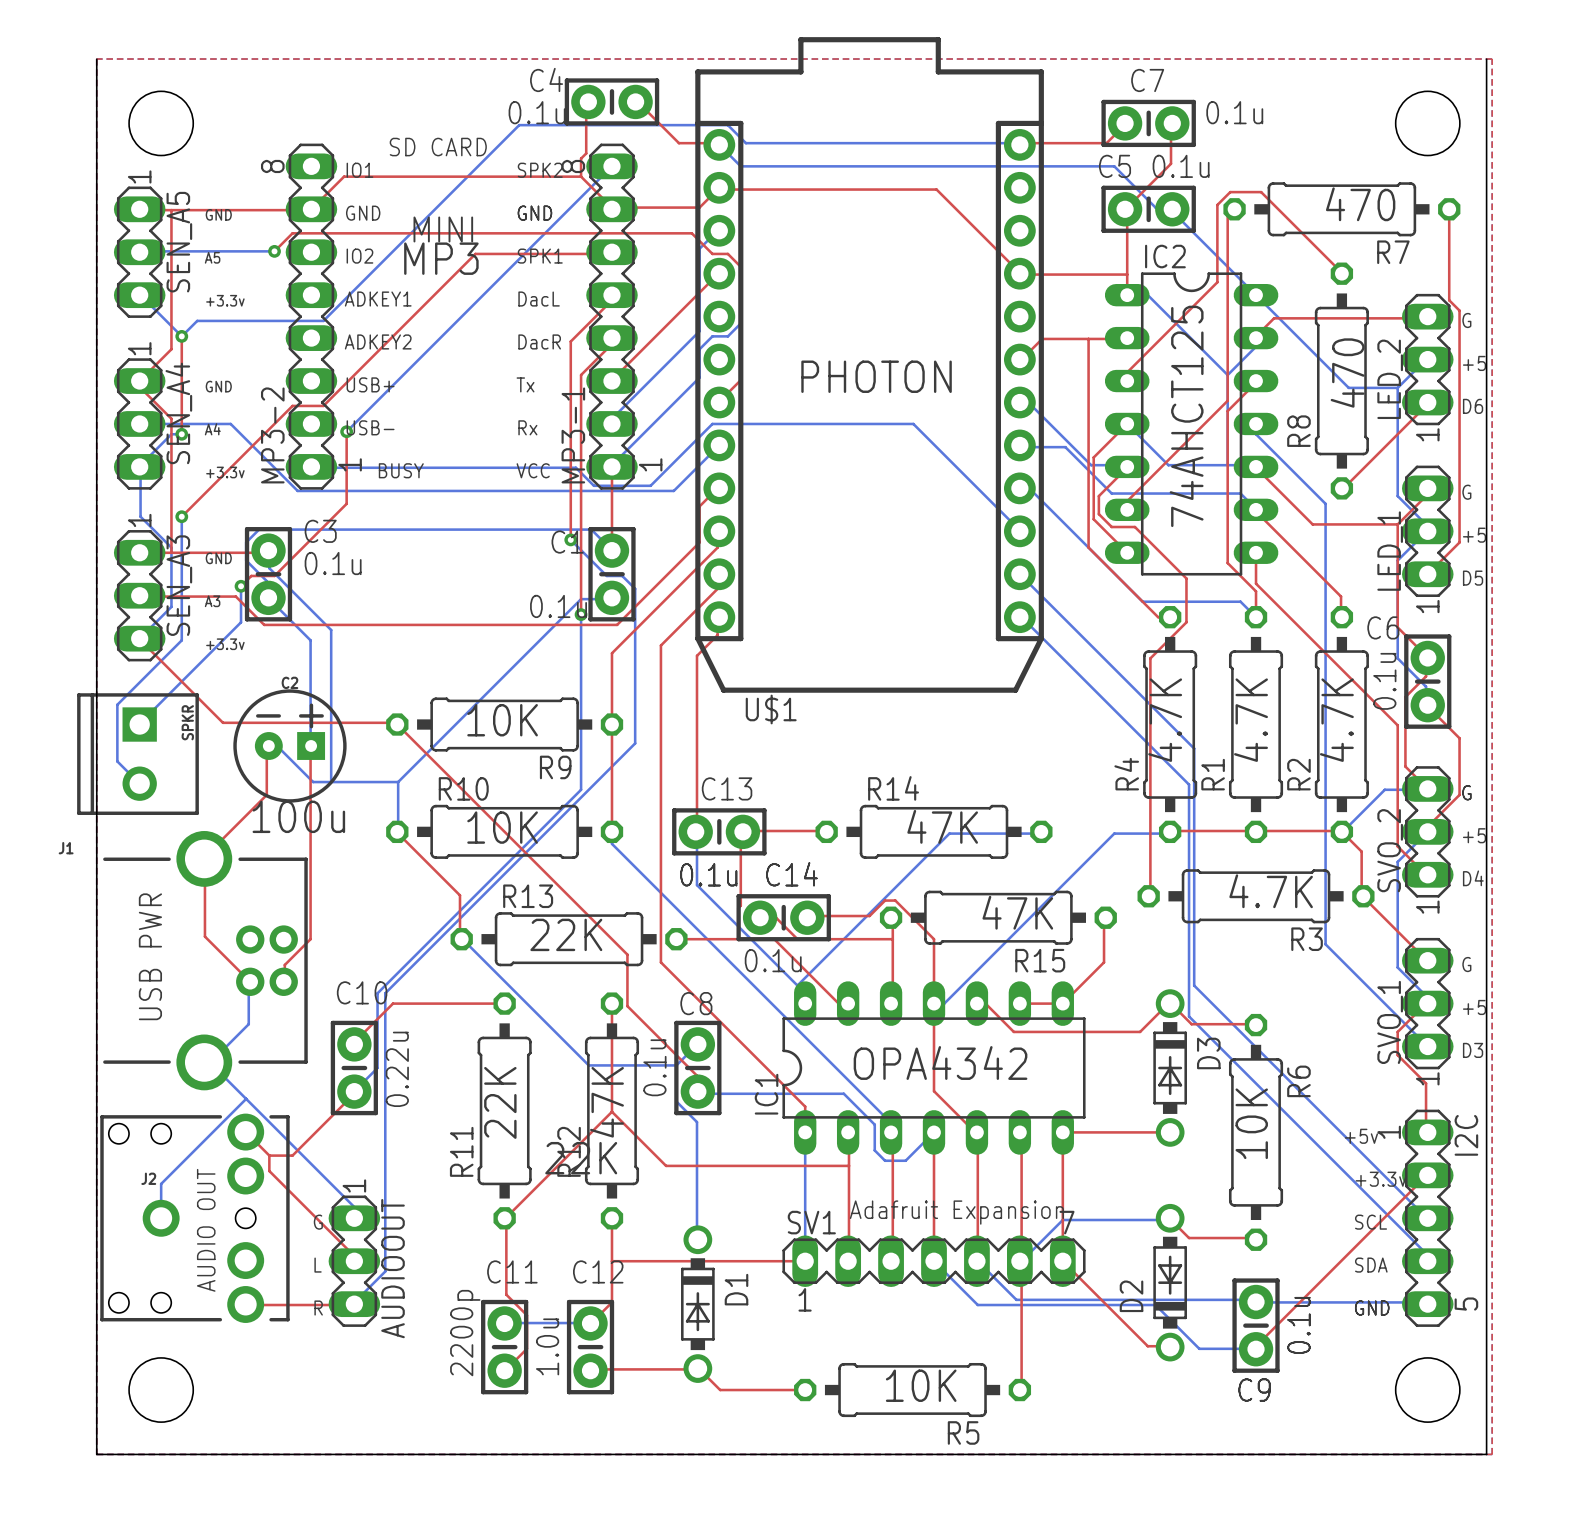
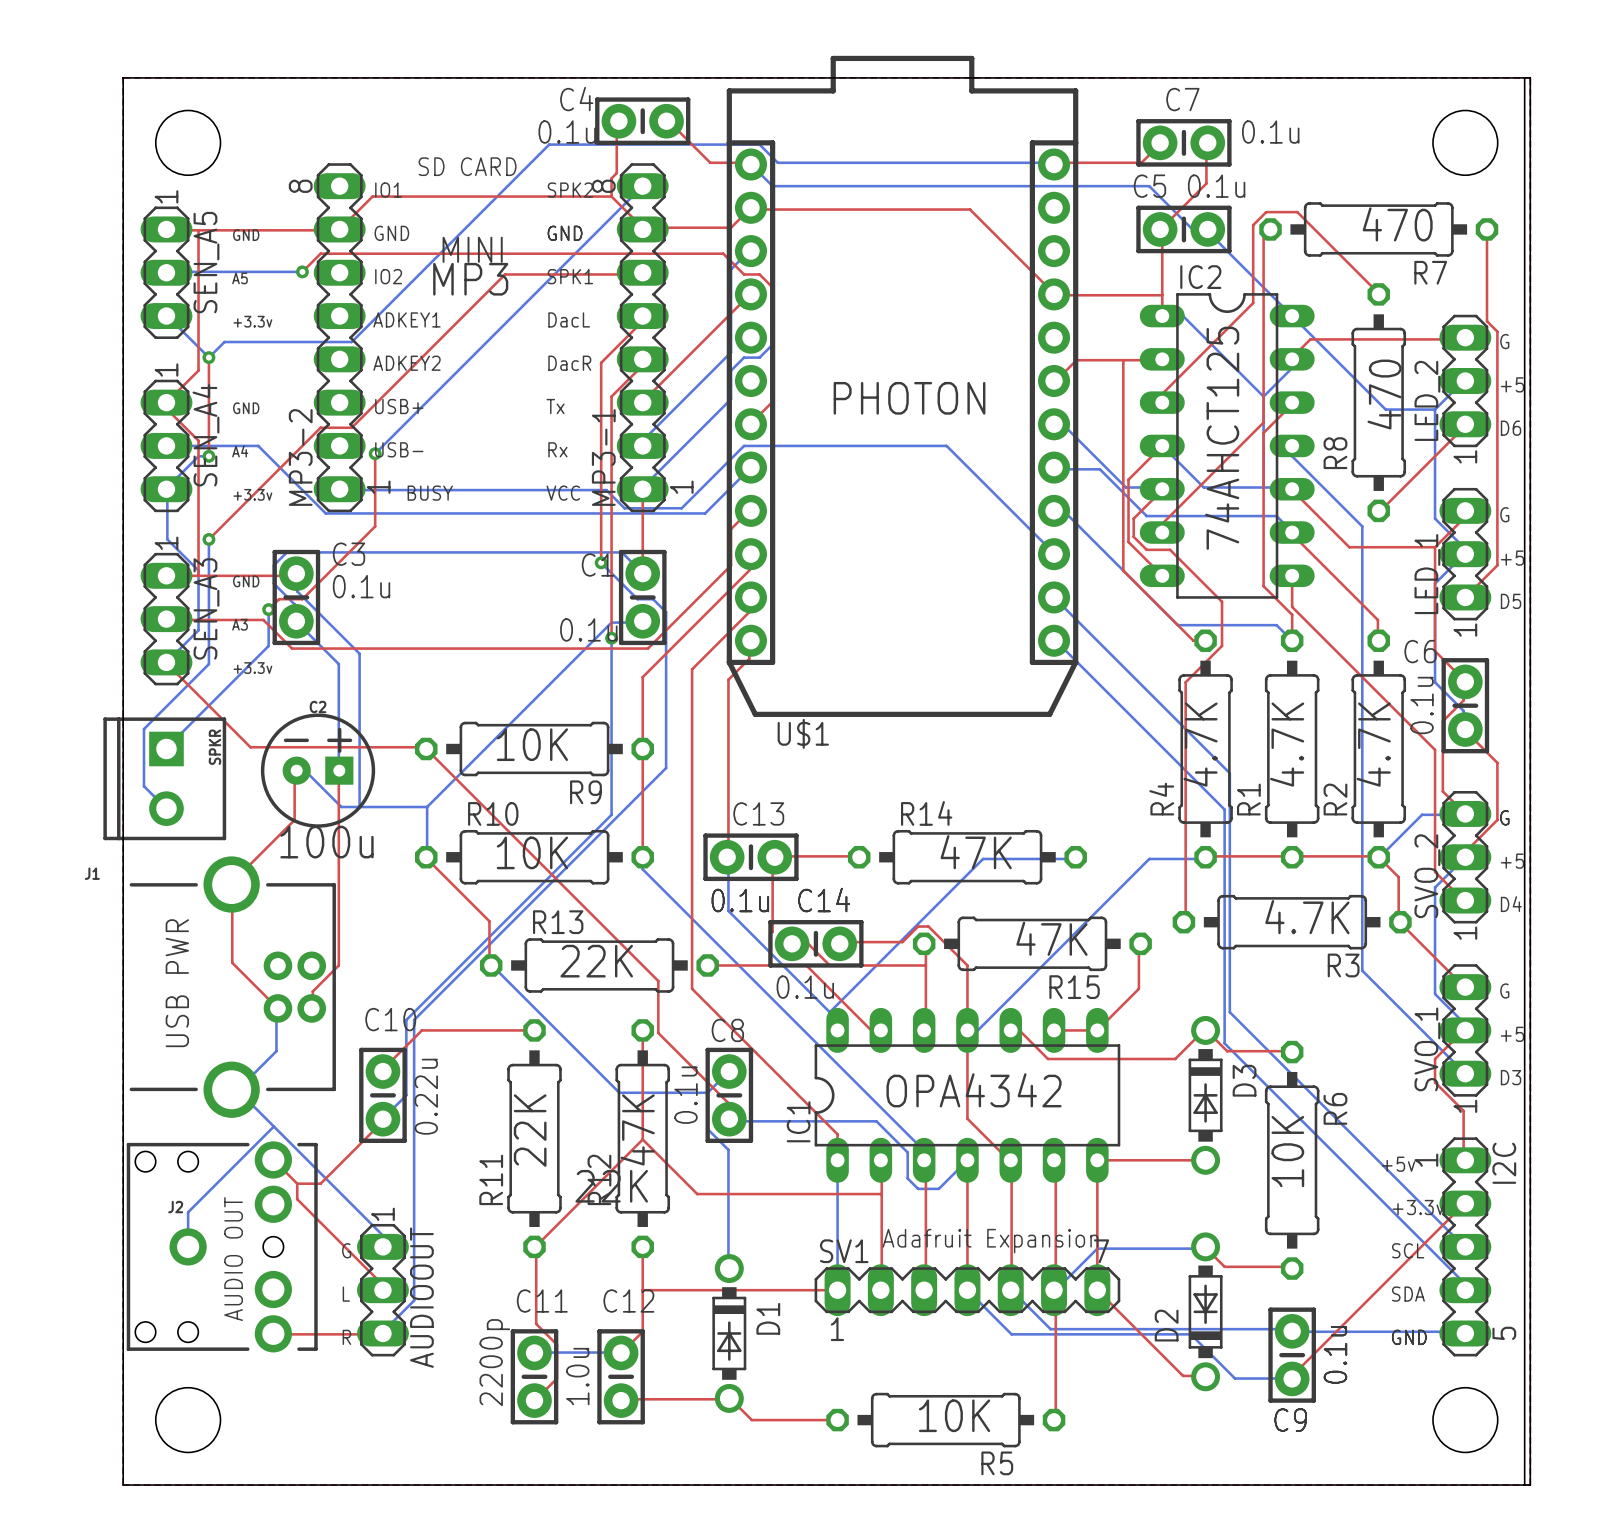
board edge: none -> (123, 77) (1530, 77) (1530, 1485) (1524, 1485)

